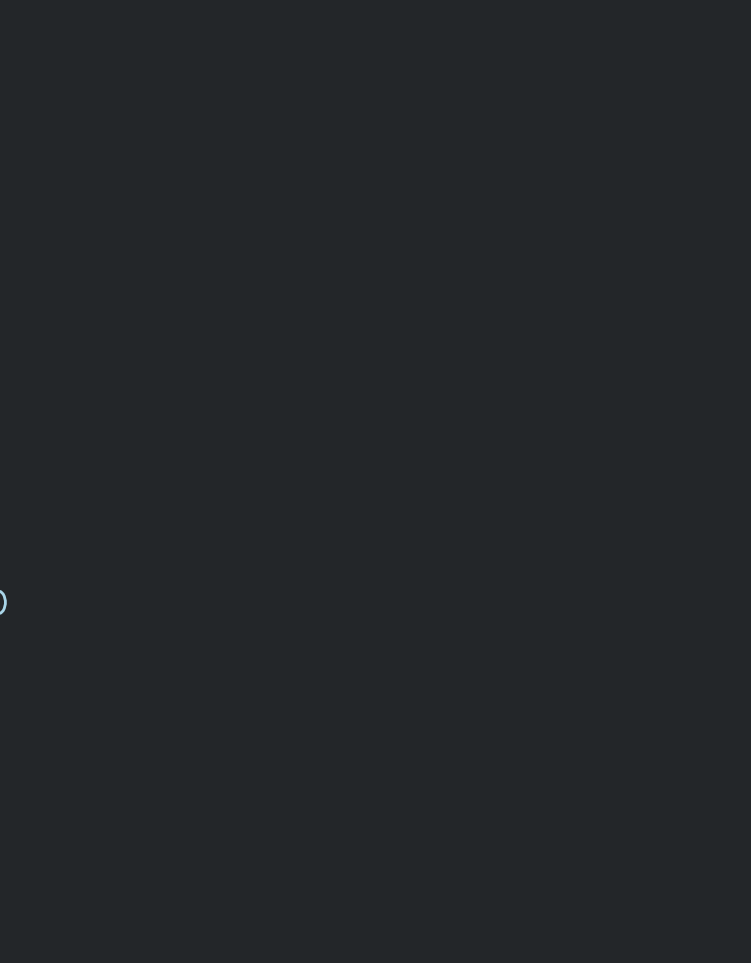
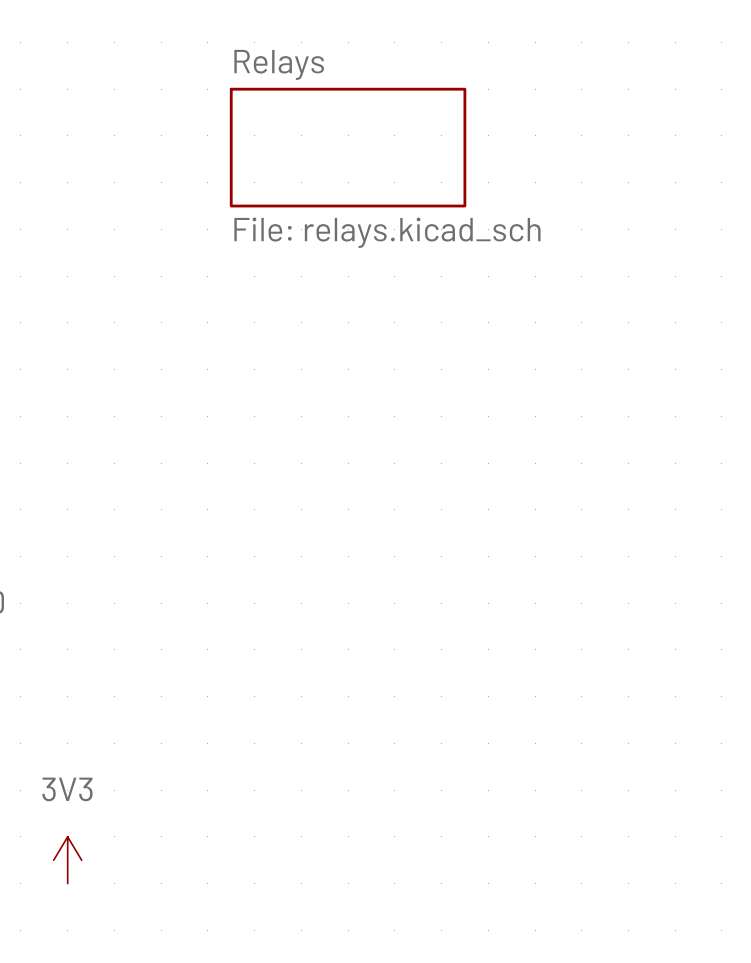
sheet Relays: none -> File: relays.kicad_sch (348, 147)
power symbol: none -> 3V3 (67, 860)

